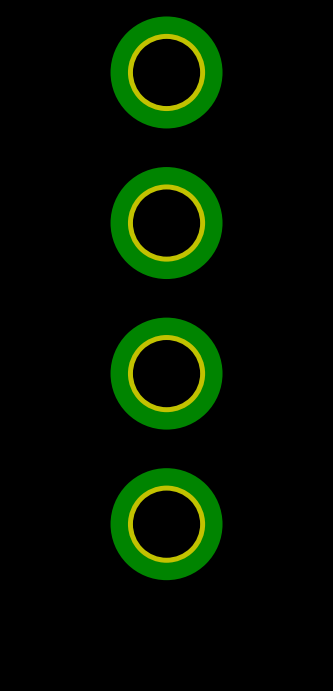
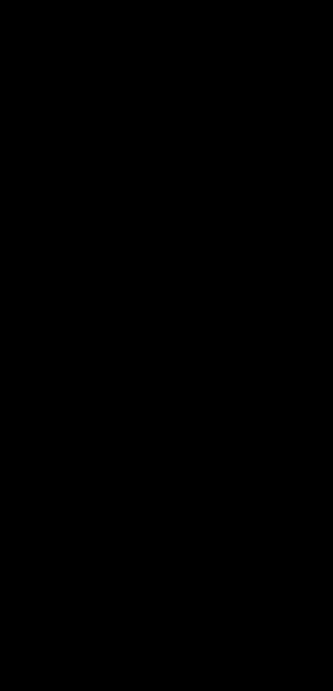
part: (166, 72) -> none
part: (166, 223) -> none
part: (166, 373) -> none
part: (166, 524) -> none

